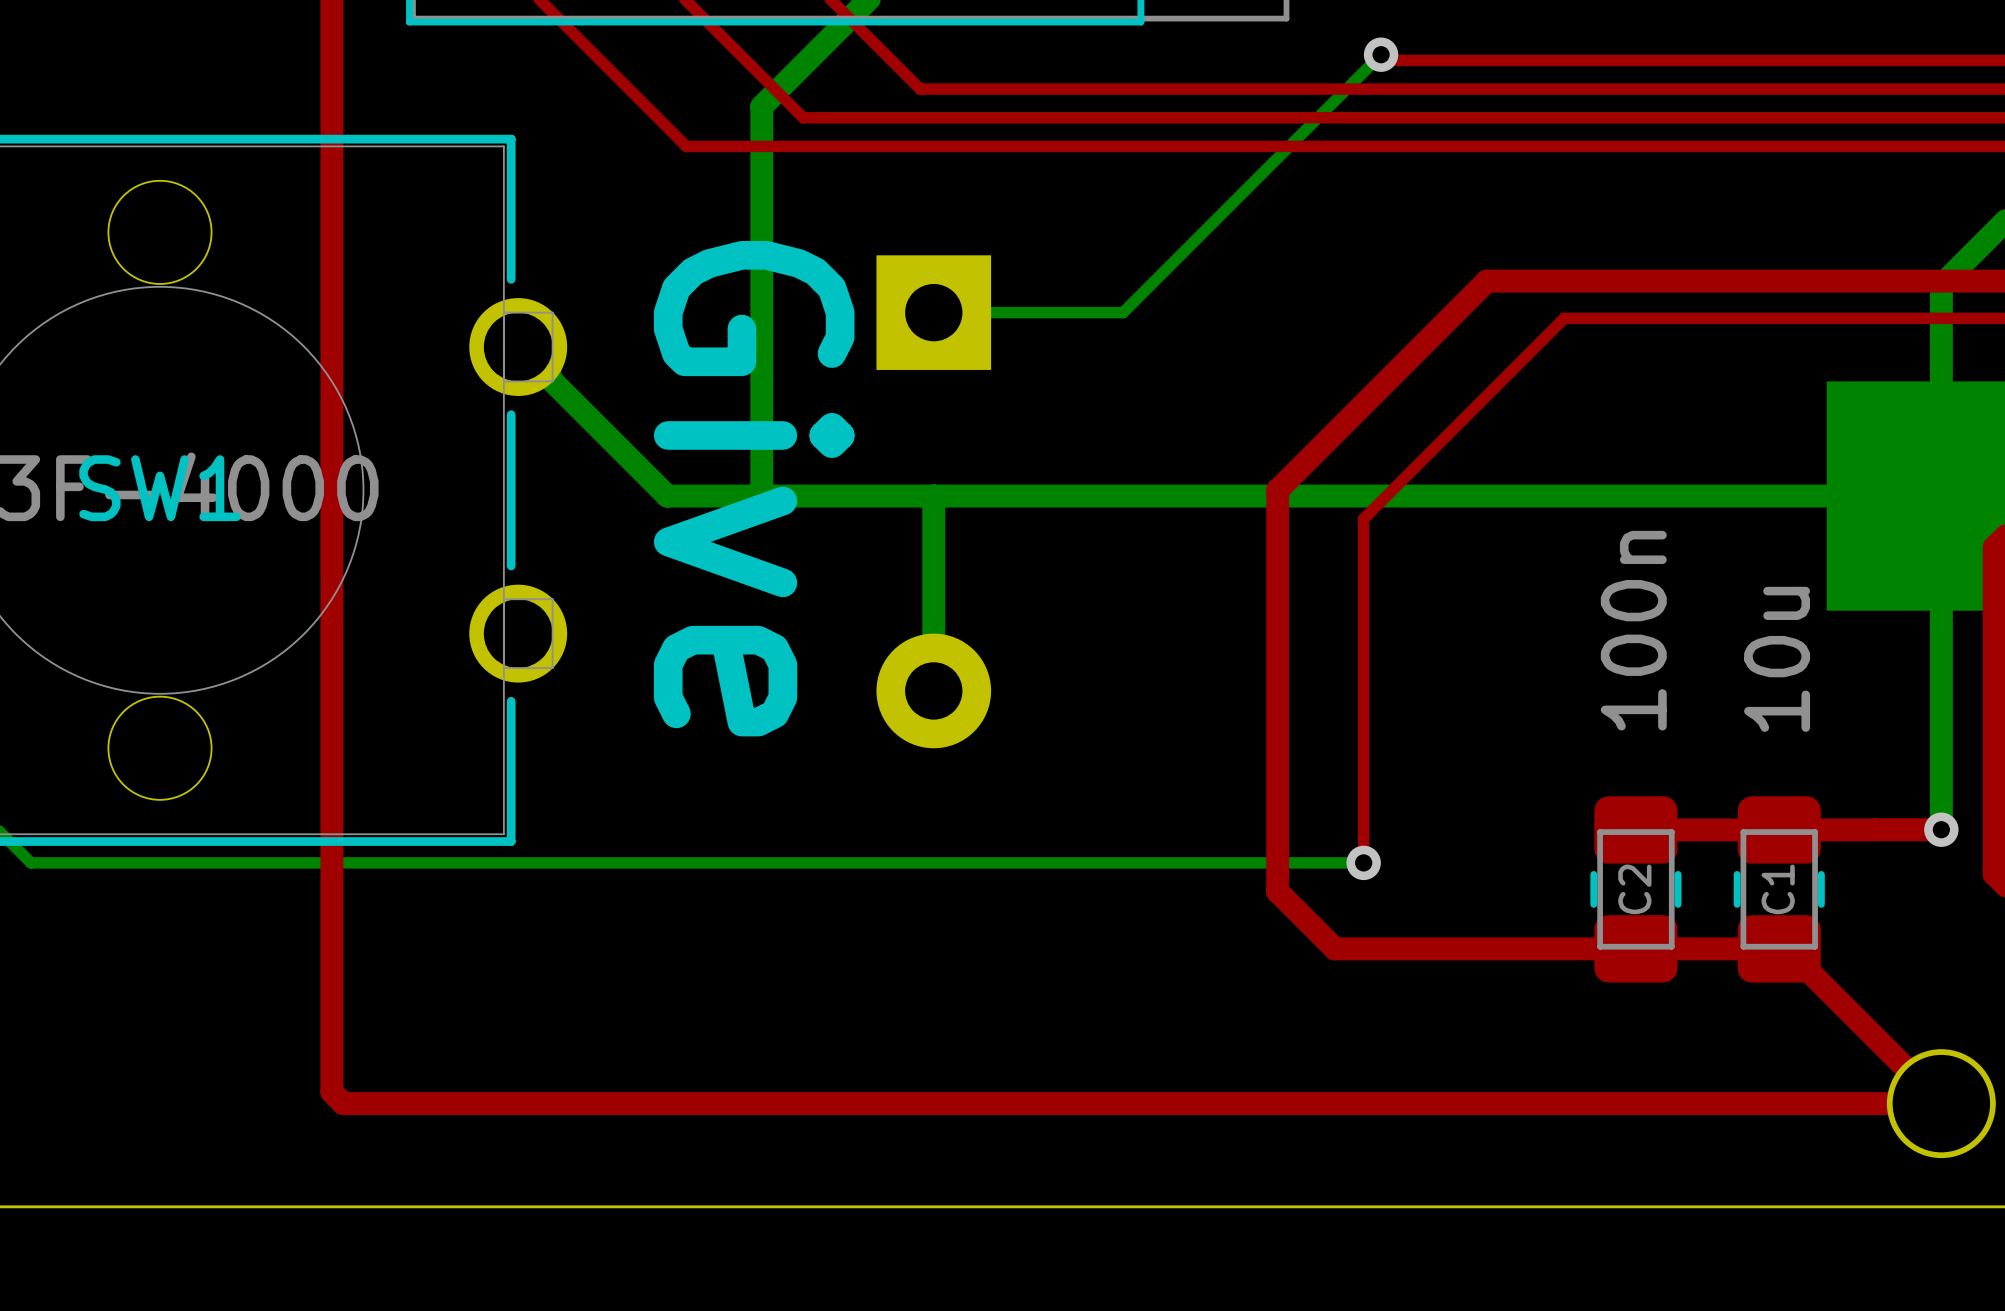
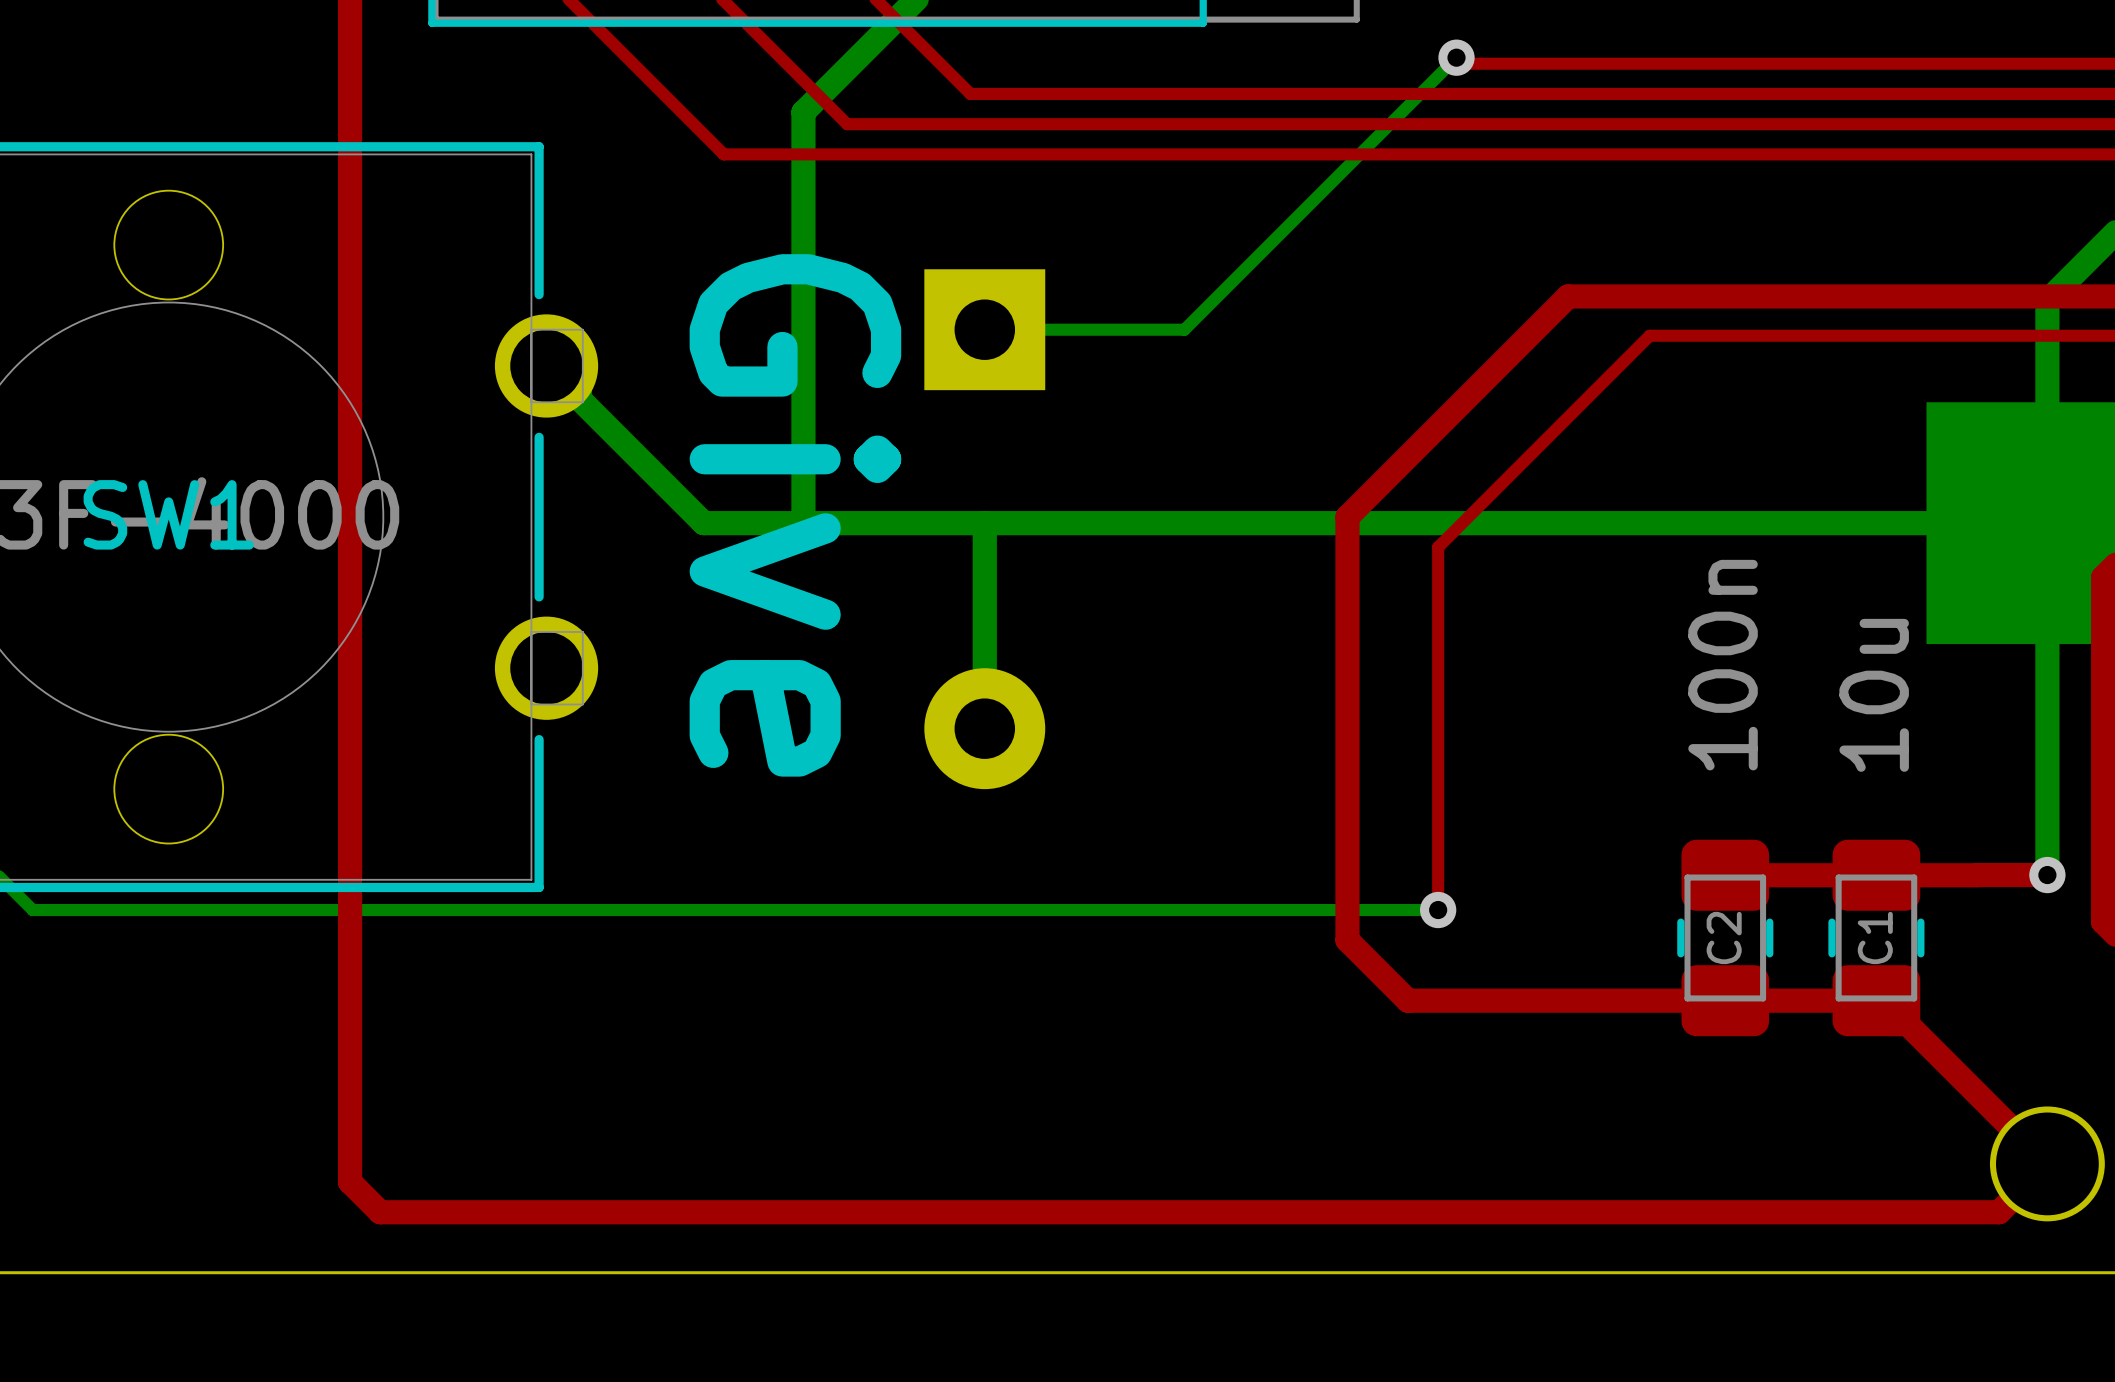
top track: (331, 1092) (343, 1103) (1941, 1103) -> (350, 1151) (350, 1182) (380, 1212) (1999, 1212) (2047, 1163)

